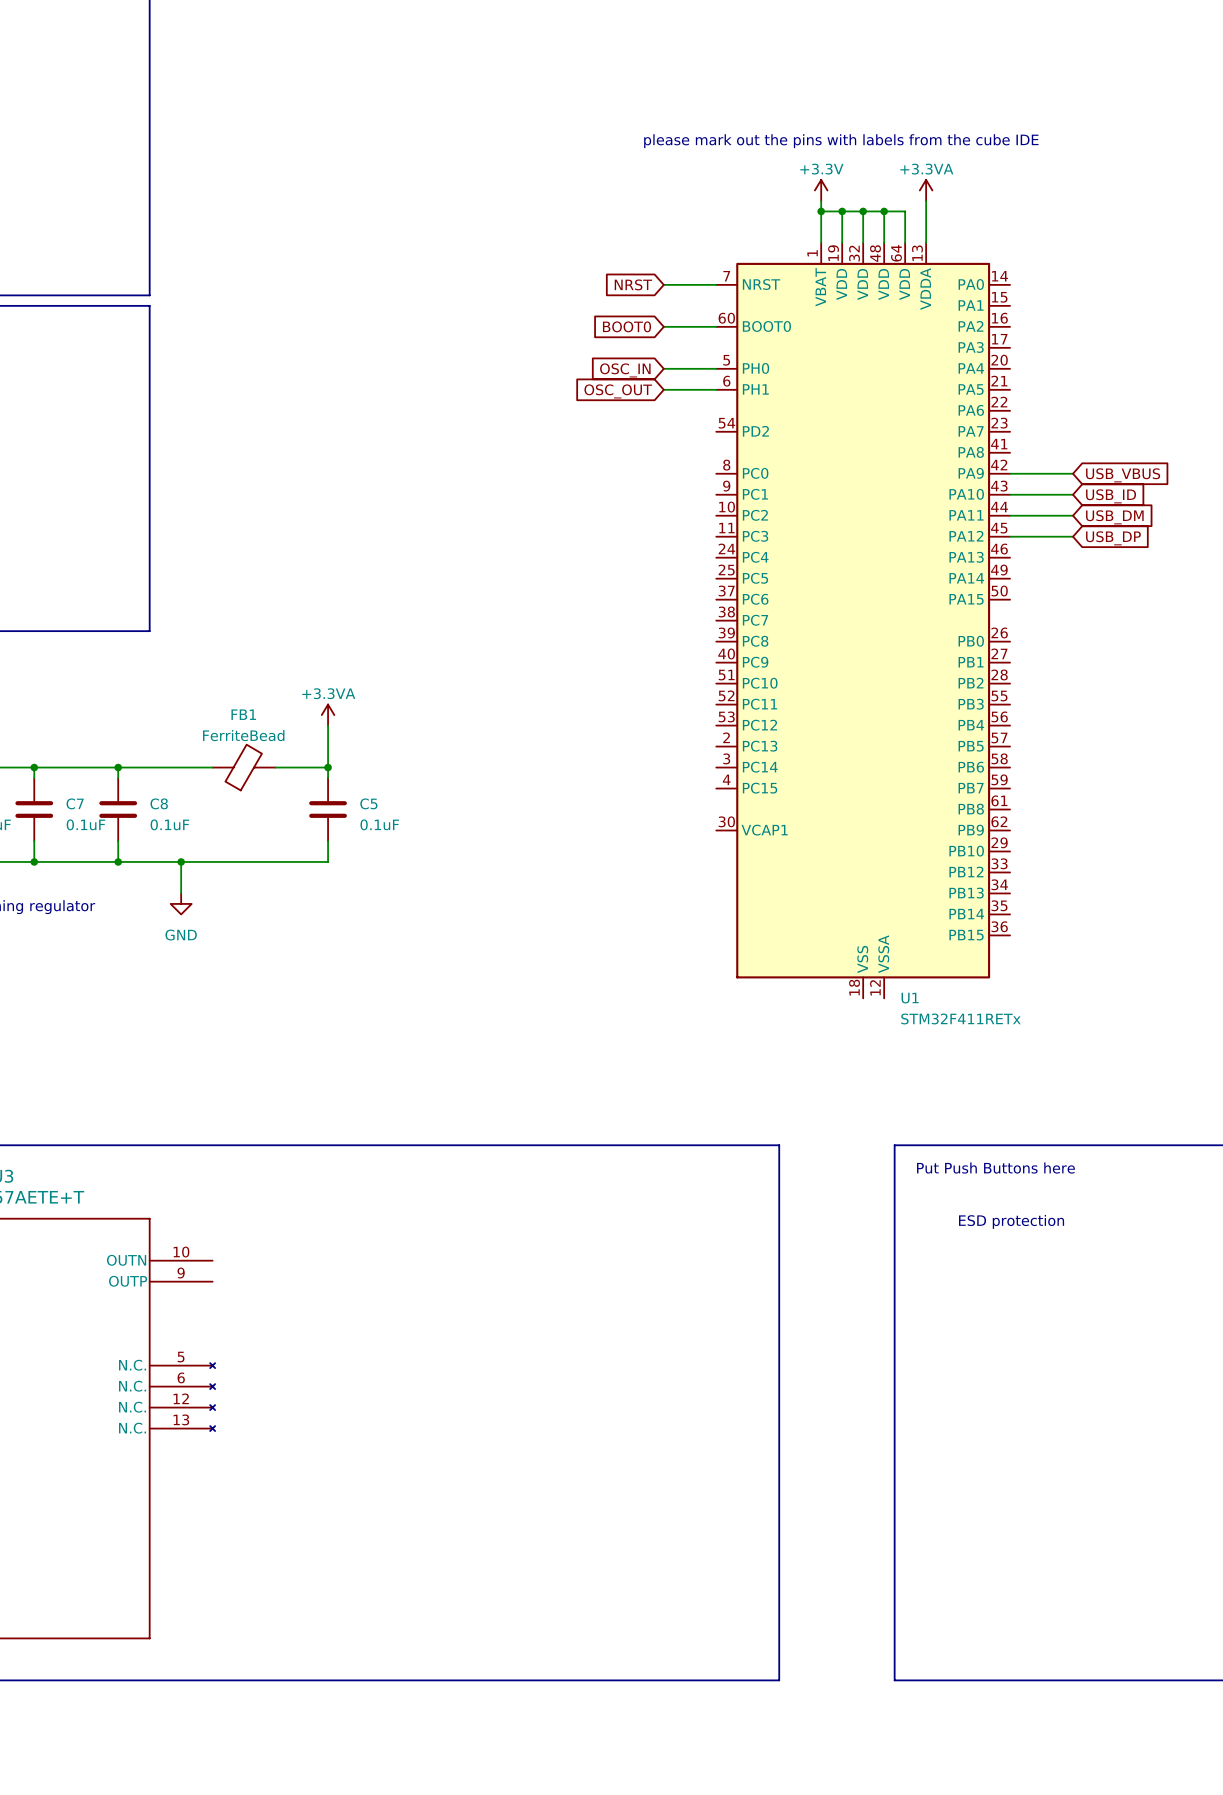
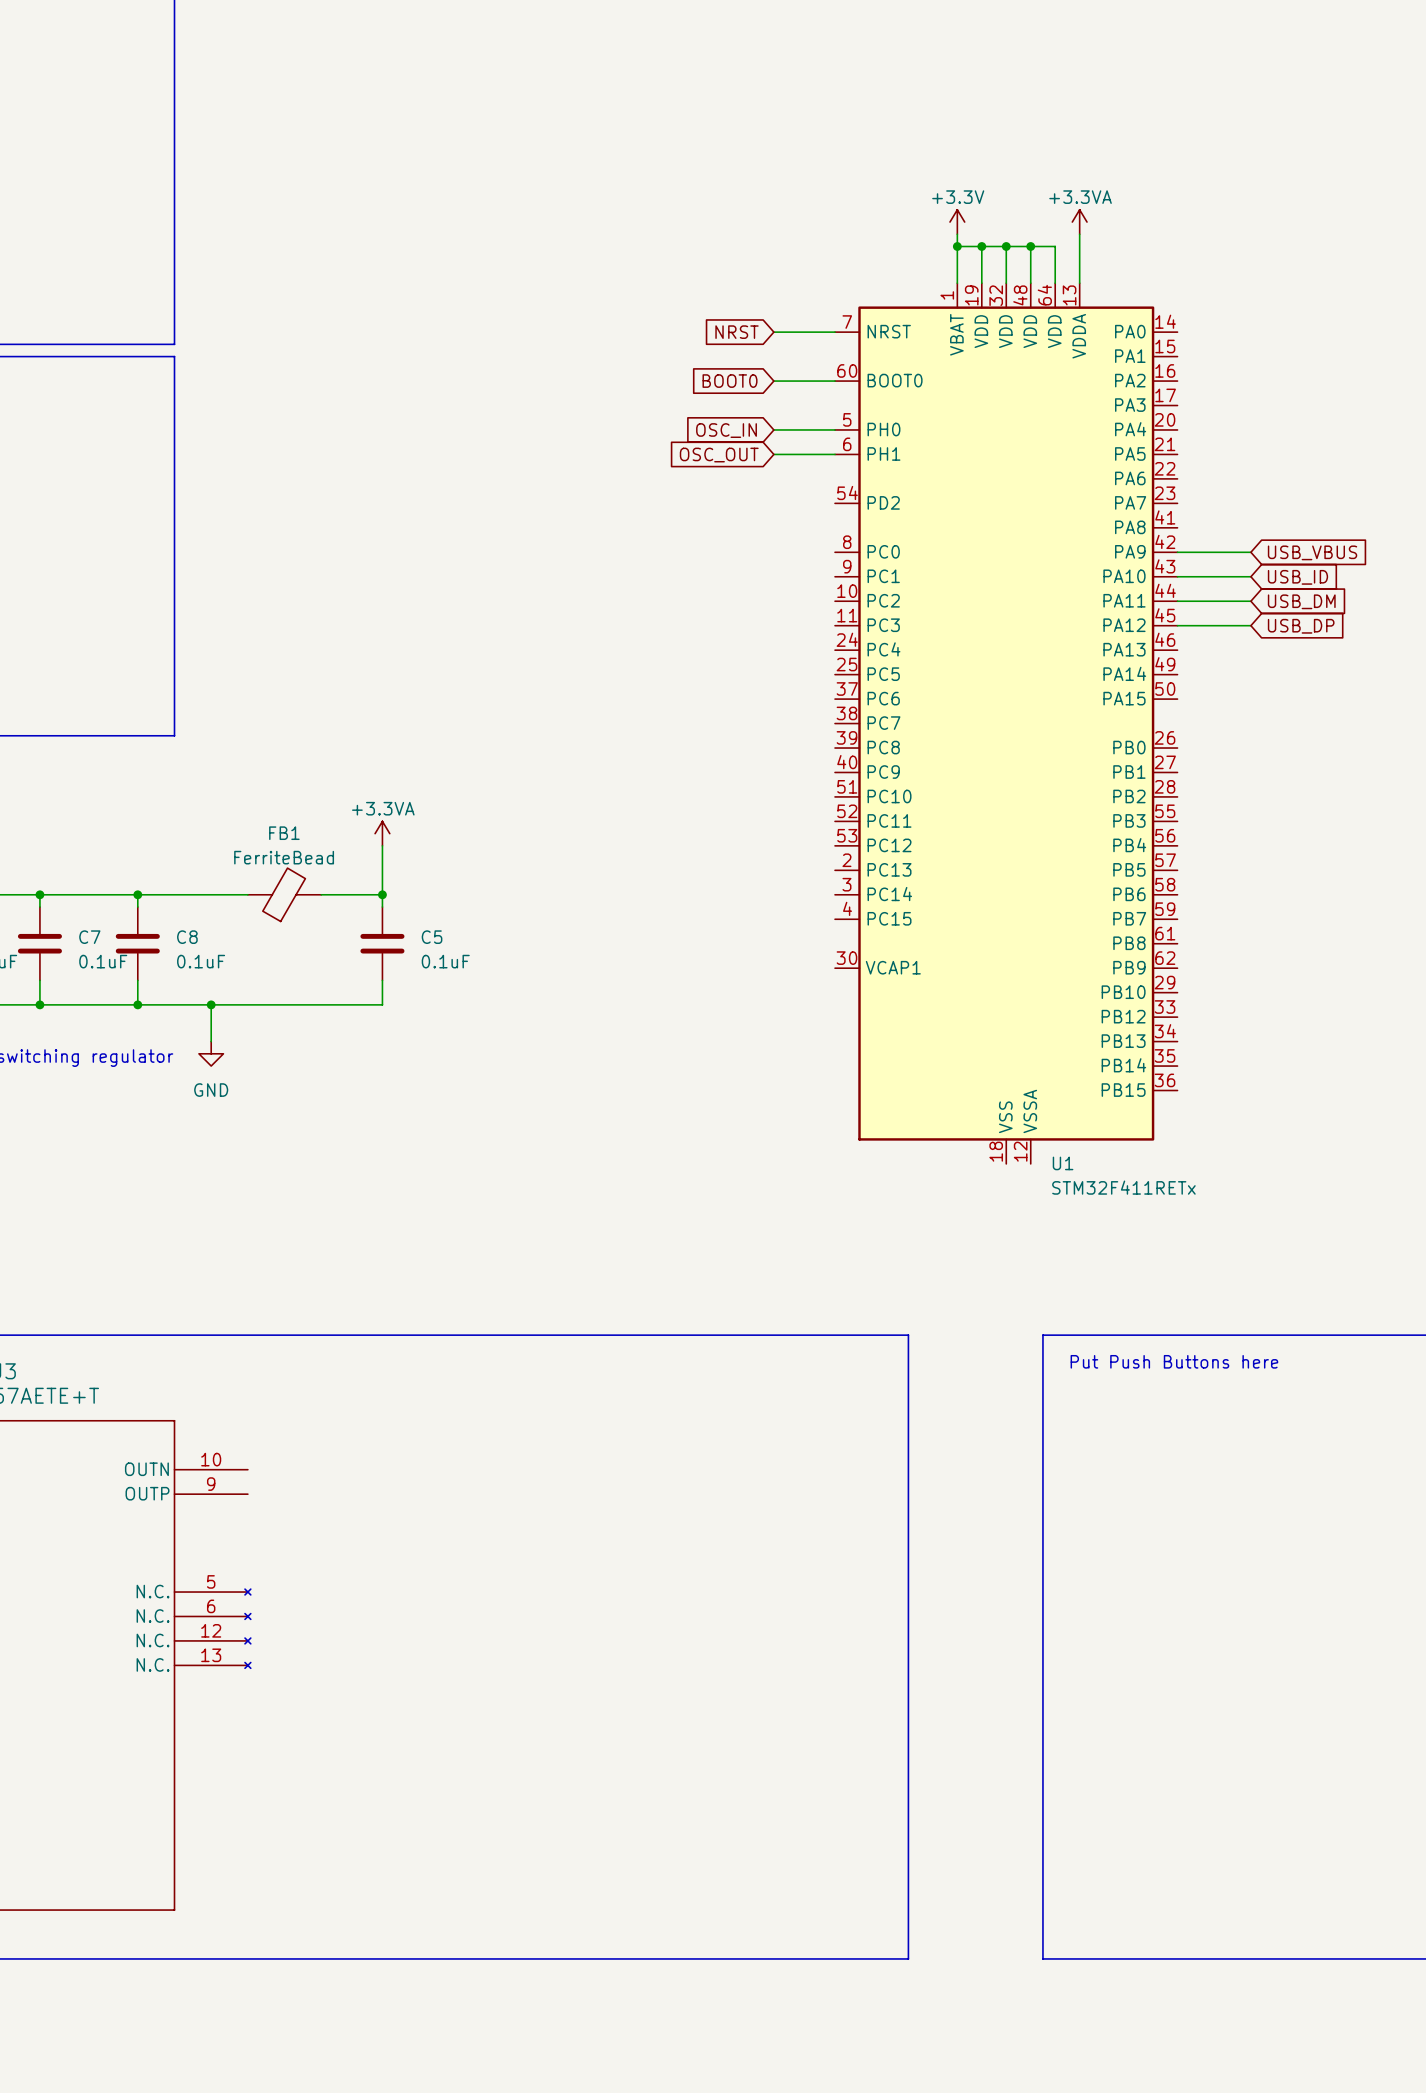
text: please mark out the pins with labels from the cube IDE (841, 141) -> none
text: ESD protection (1011, 1221) -> none

